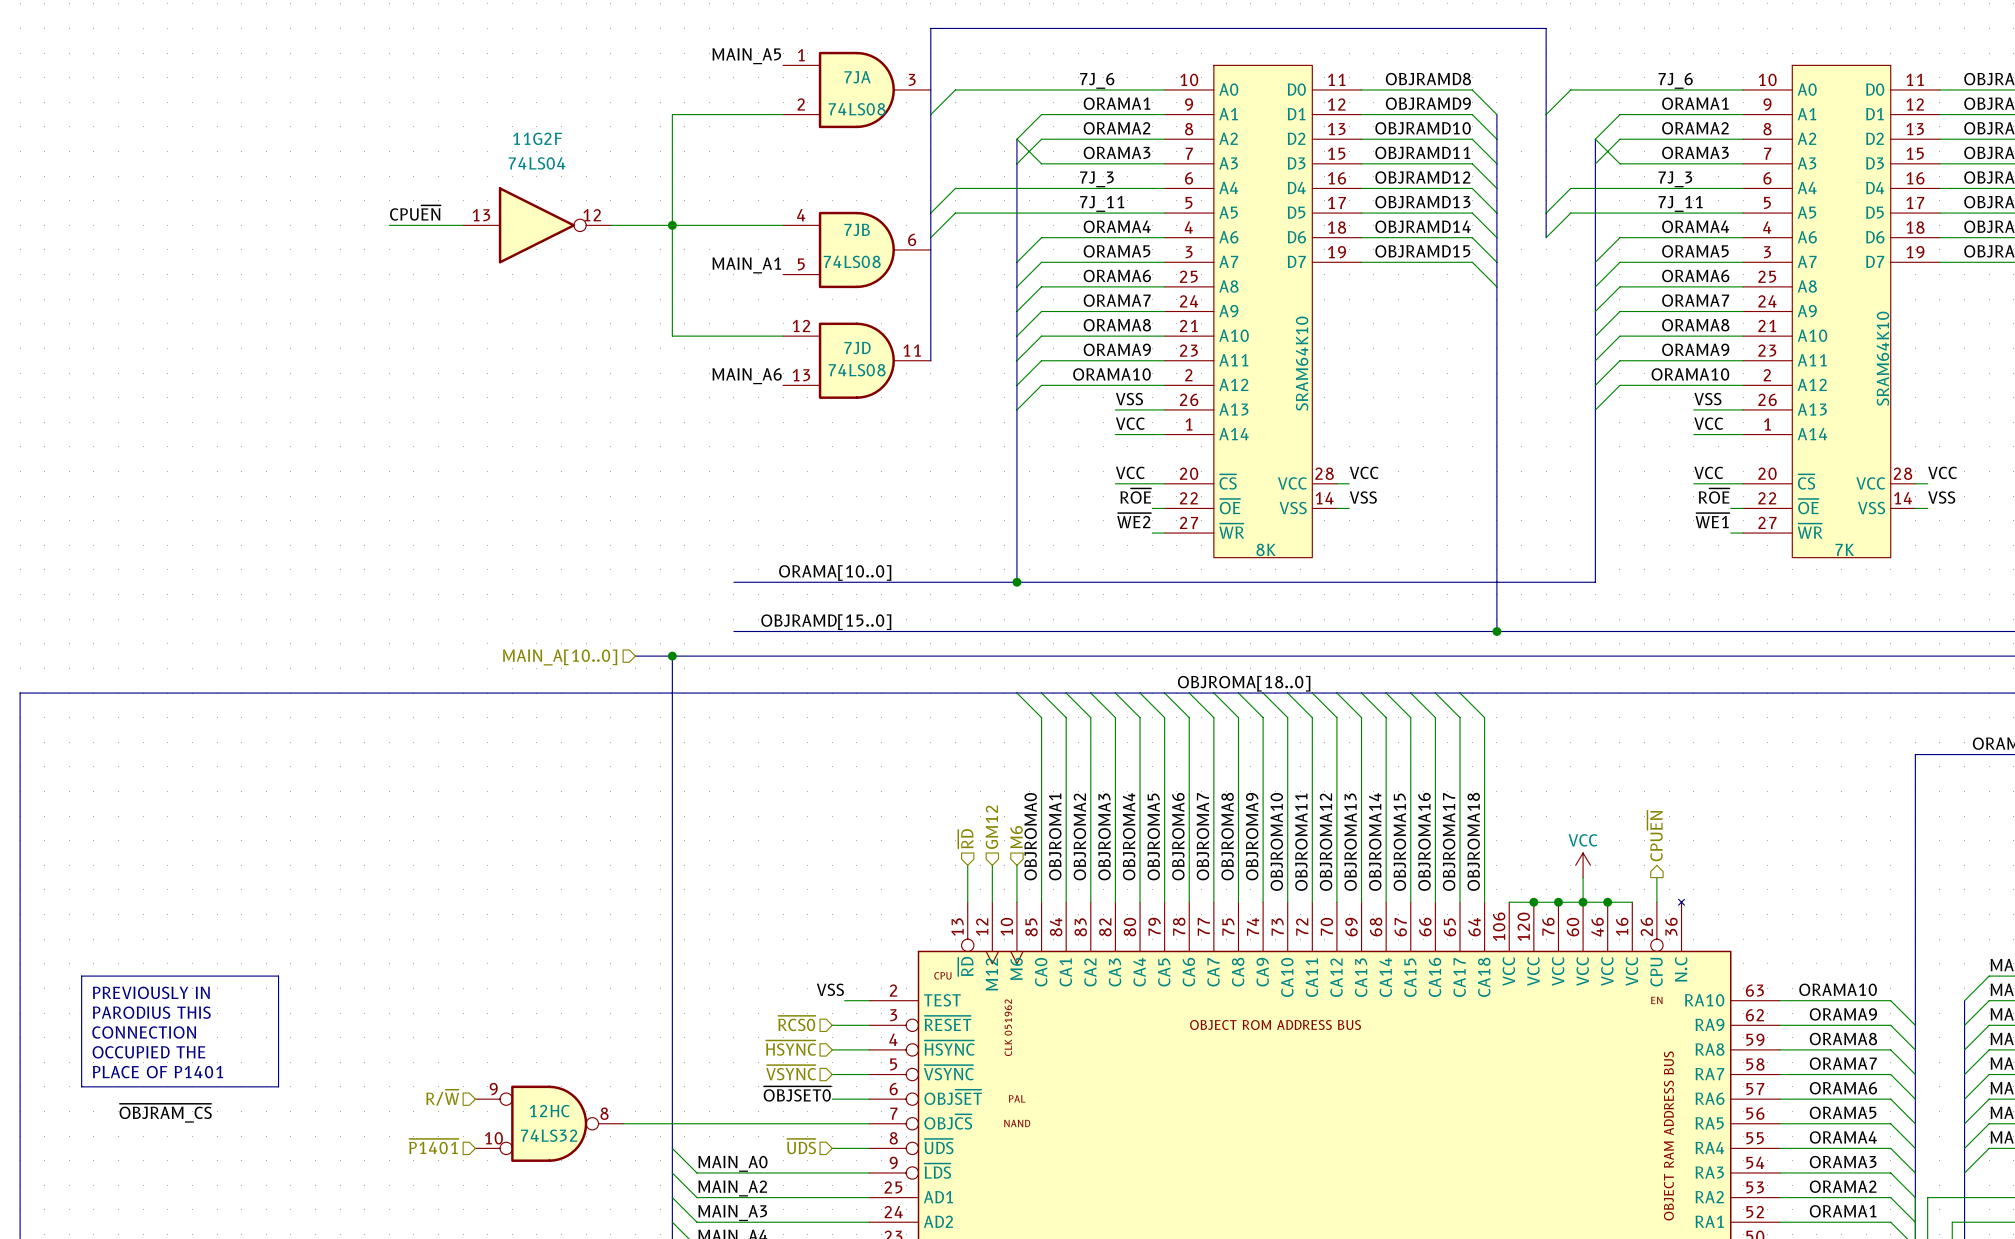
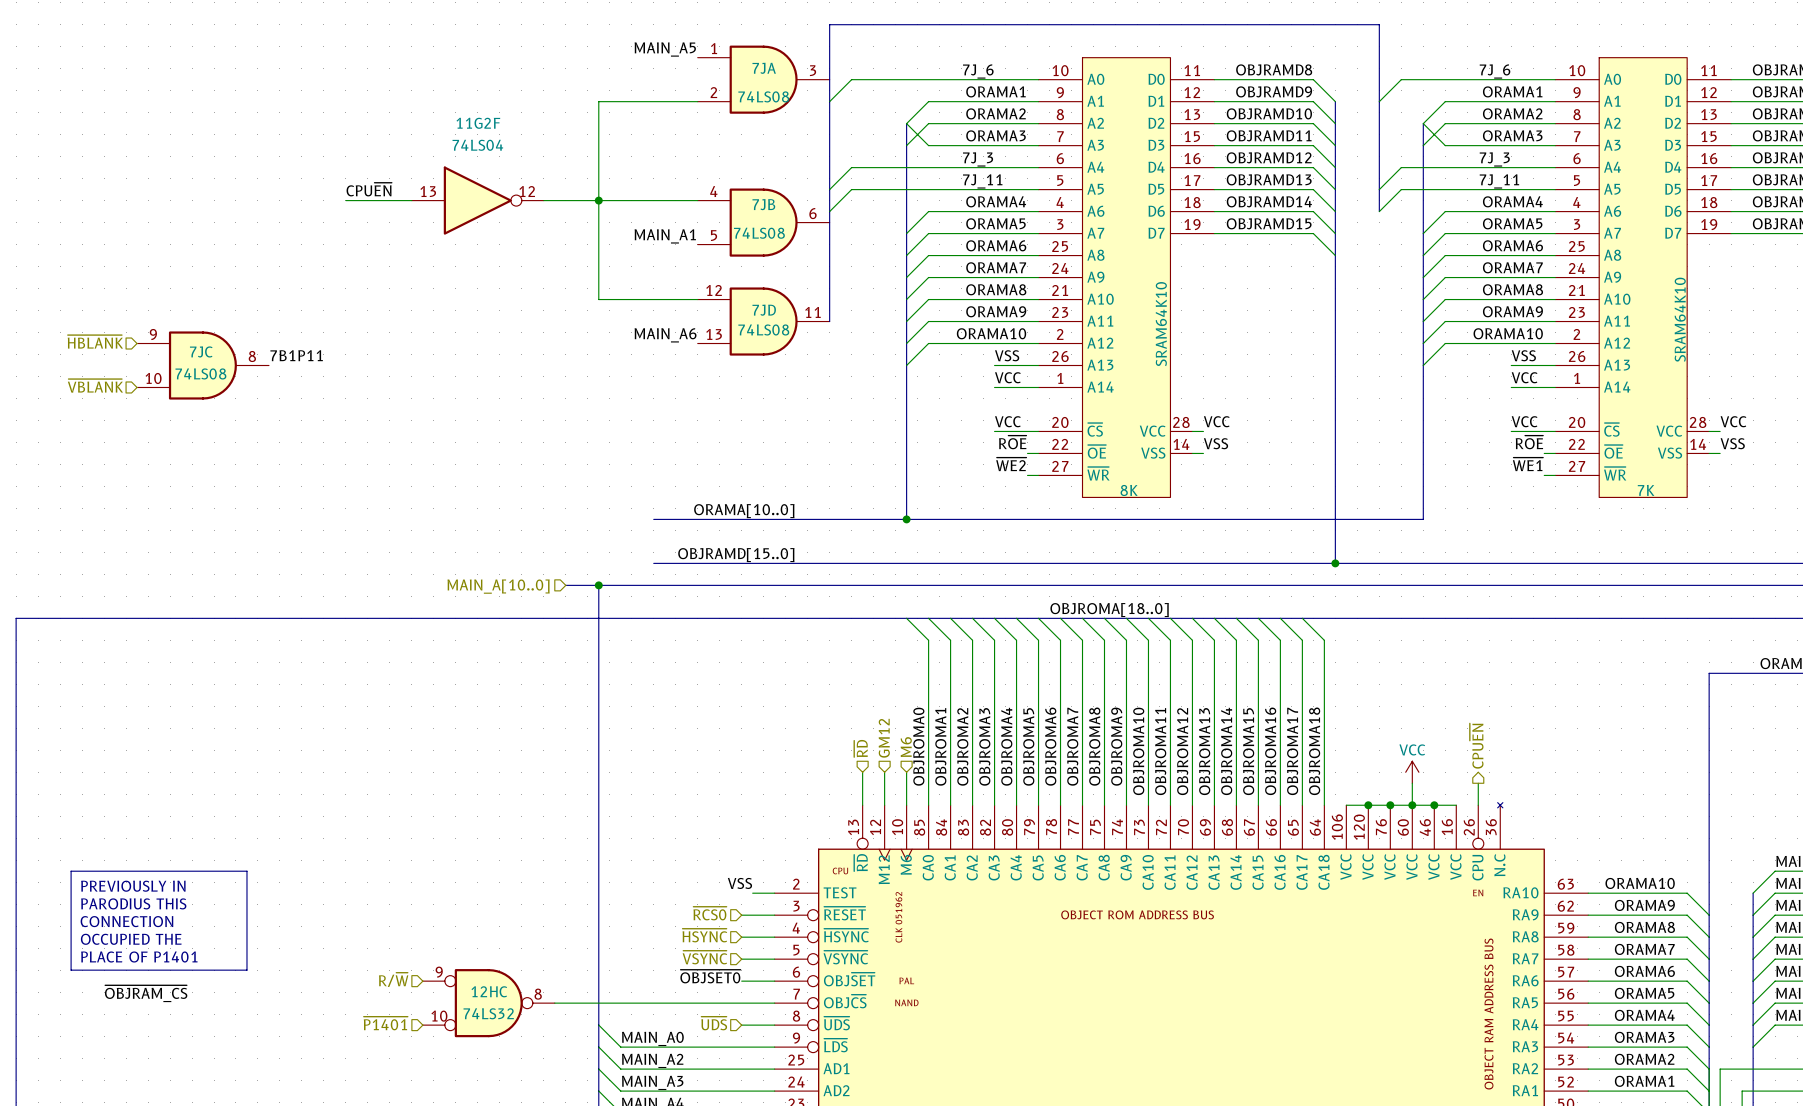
hierarchical label: none -> ~{HBLANK} (95, 341)
label: none -> 7B1P11 (296, 355)
7JC: none -> 74LS08 (203, 365)
hierarchical label: none -> ~{VBLANK} (95, 385)

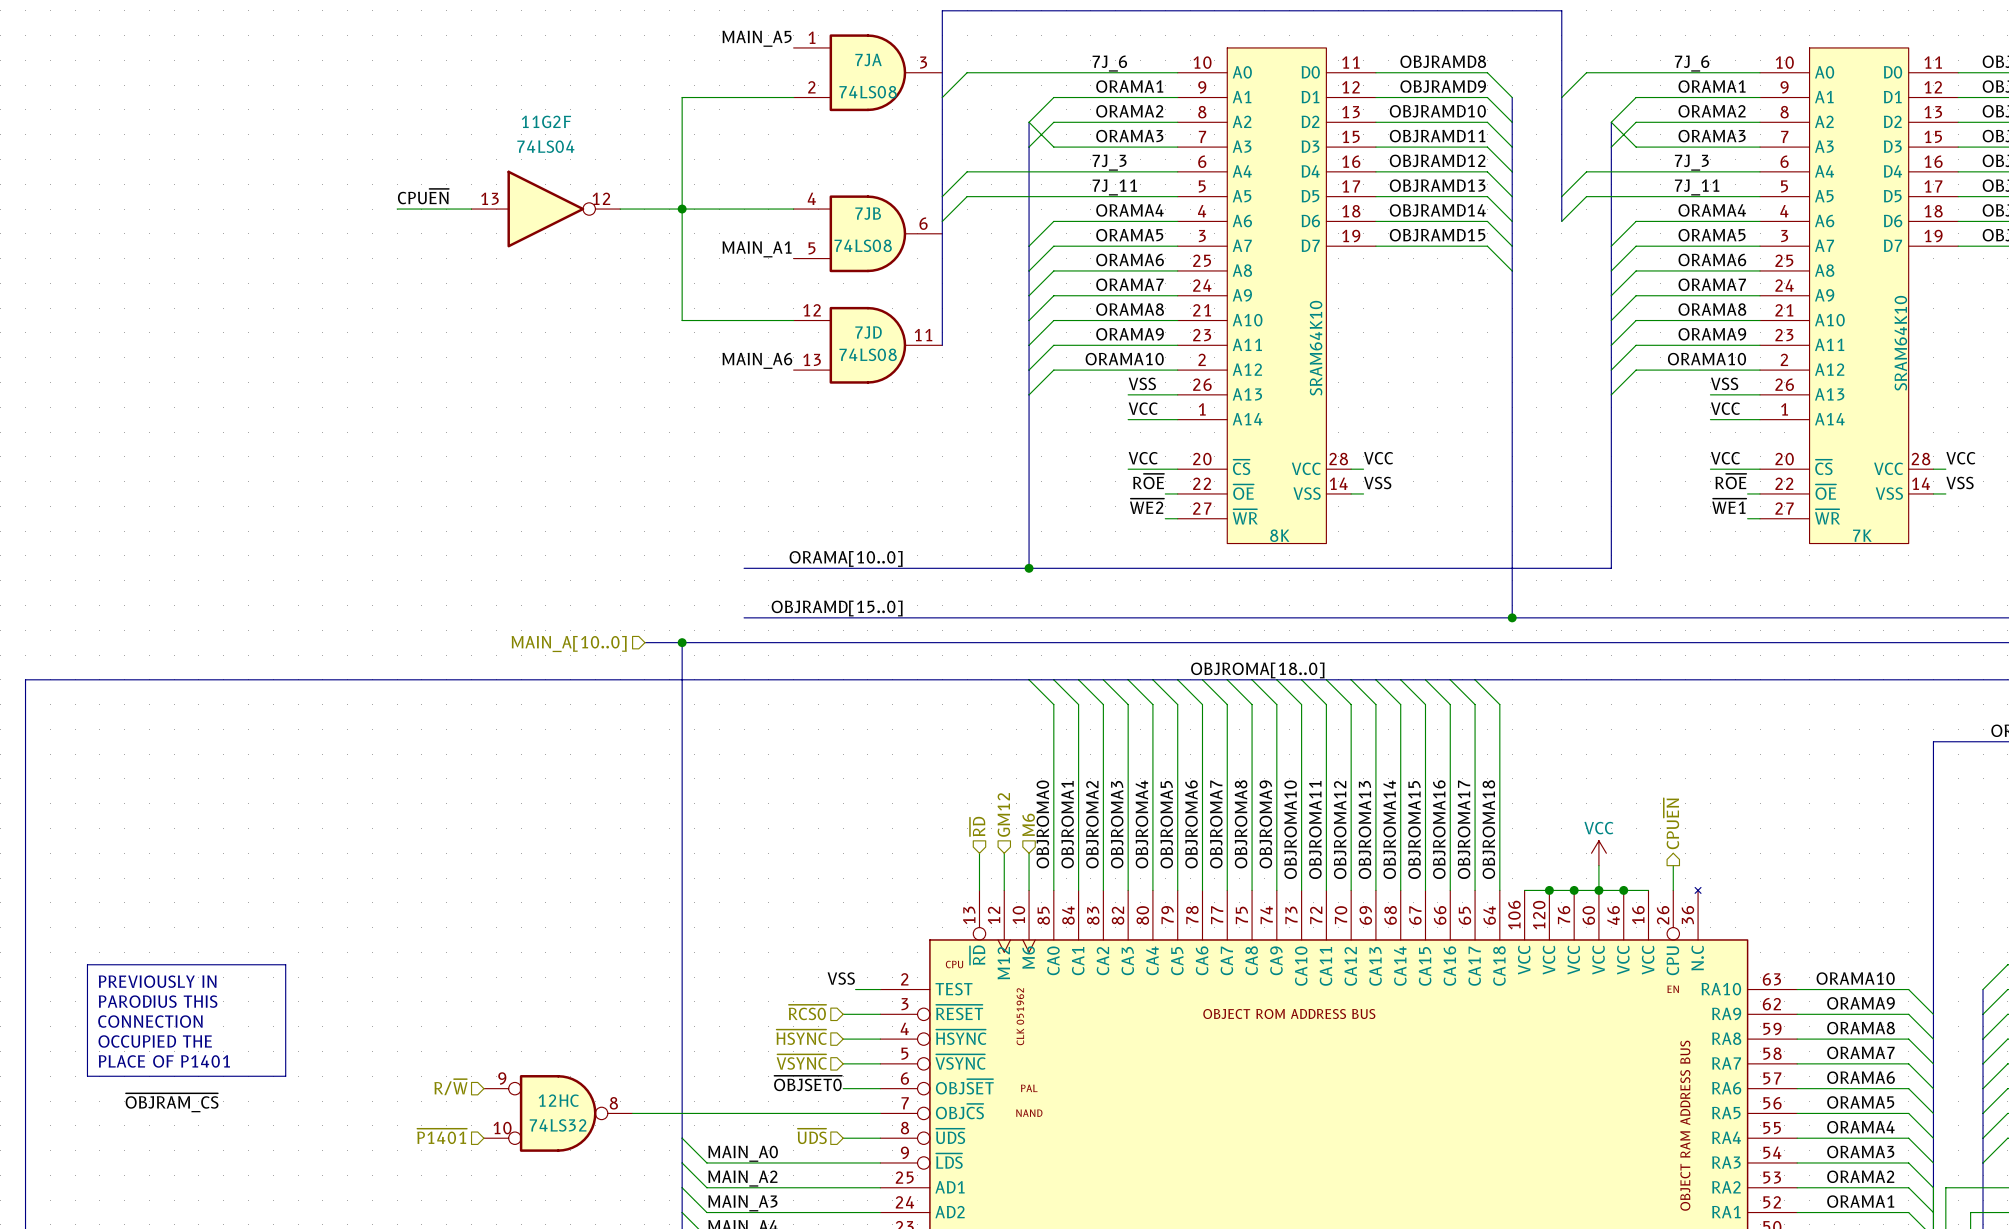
hierarchical label: ~{HBLANK} (95, 341) -> none
label: 7B1P11 (296, 355) -> none
7JC: 74LS08 (203, 365) -> none
hierarchical label: ~{VBLANK} (95, 385) -> none

